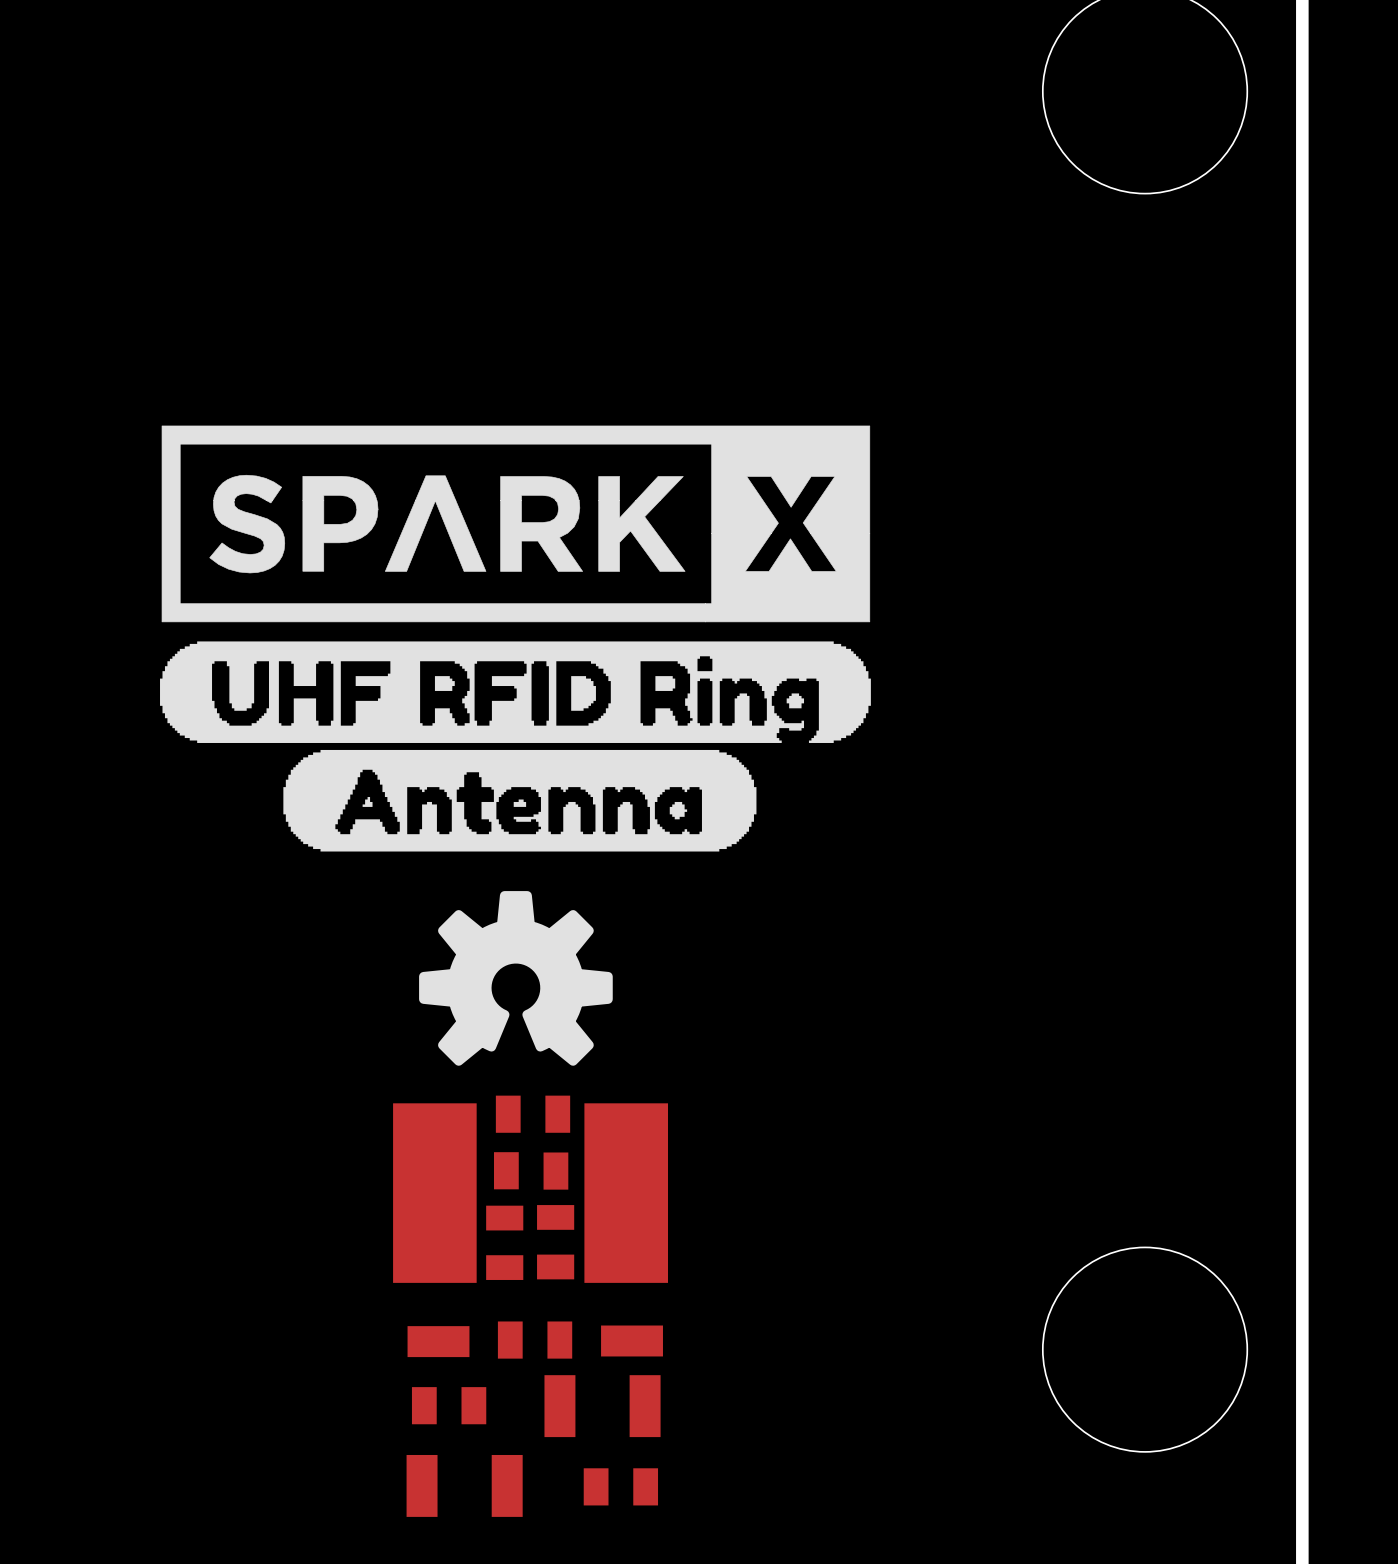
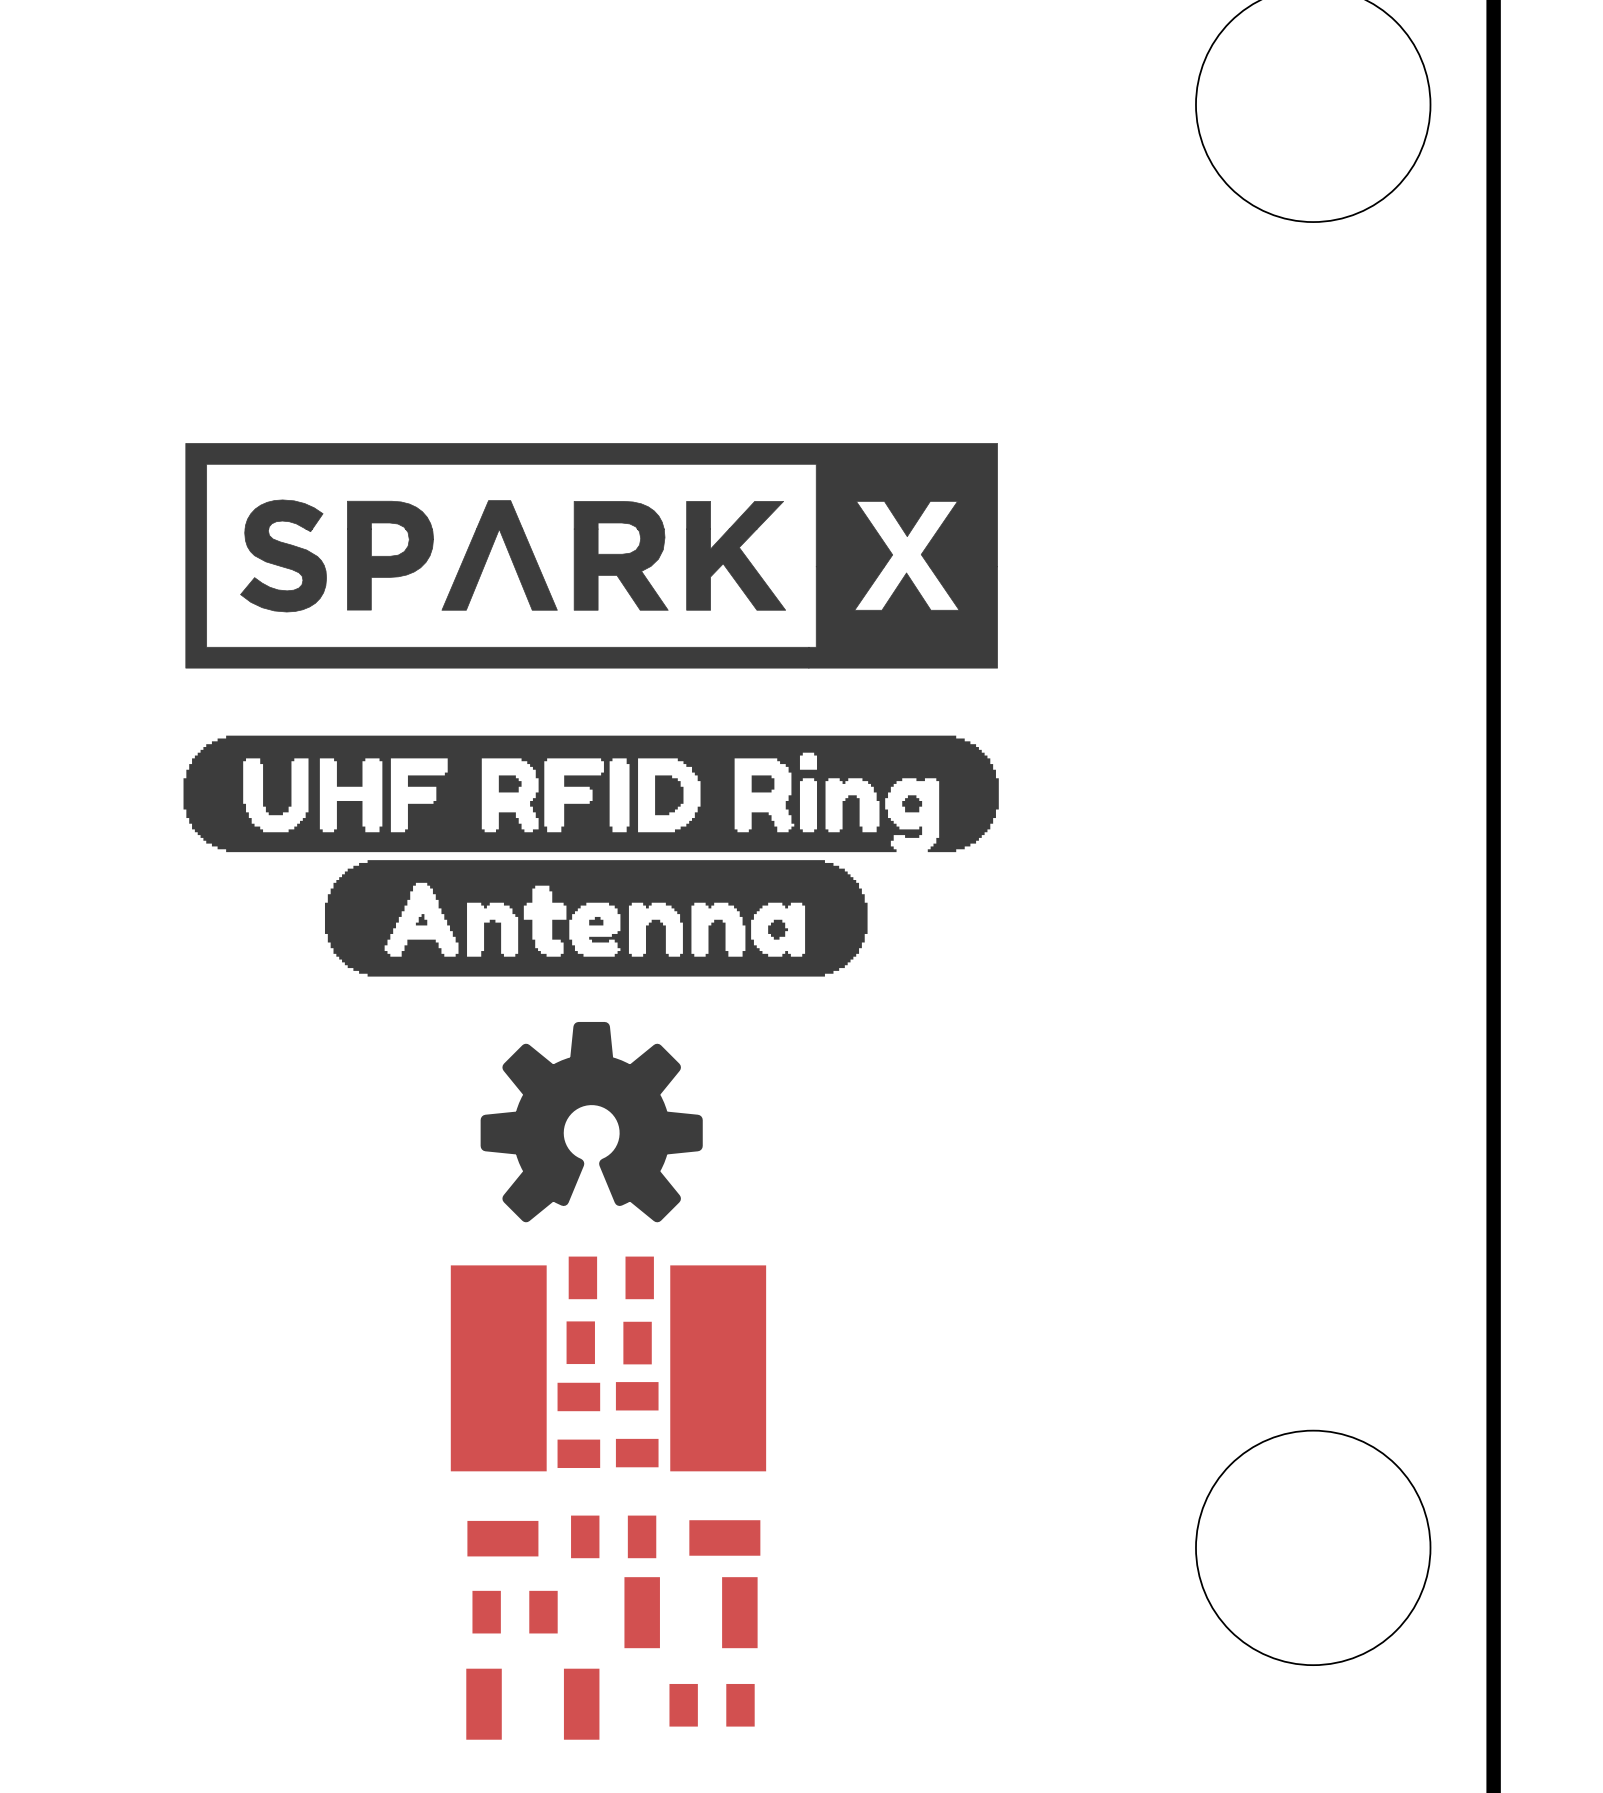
drawing position: (515, 523) -> (591, 555)

